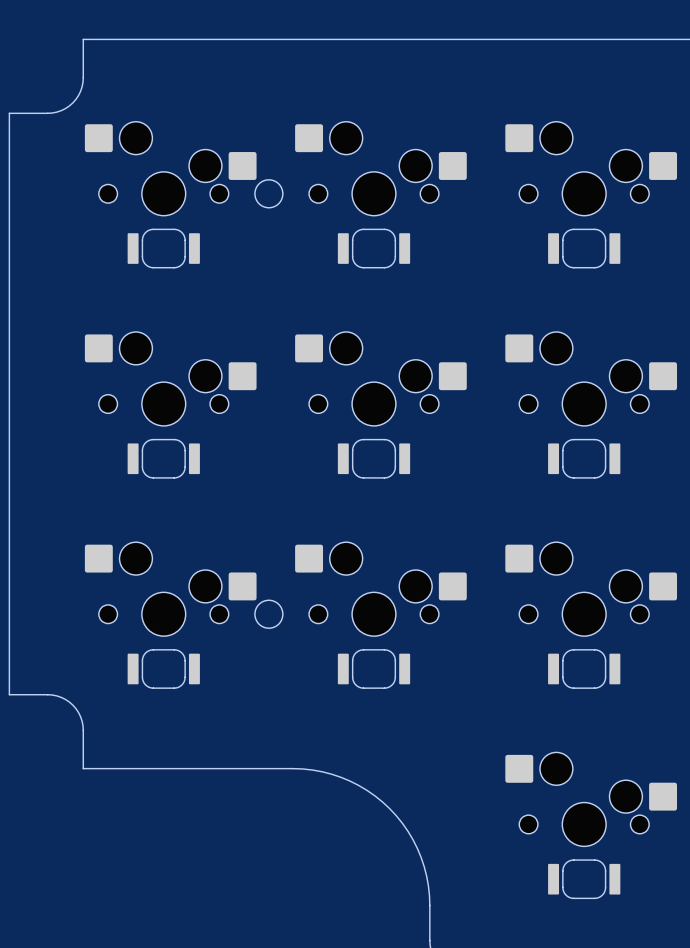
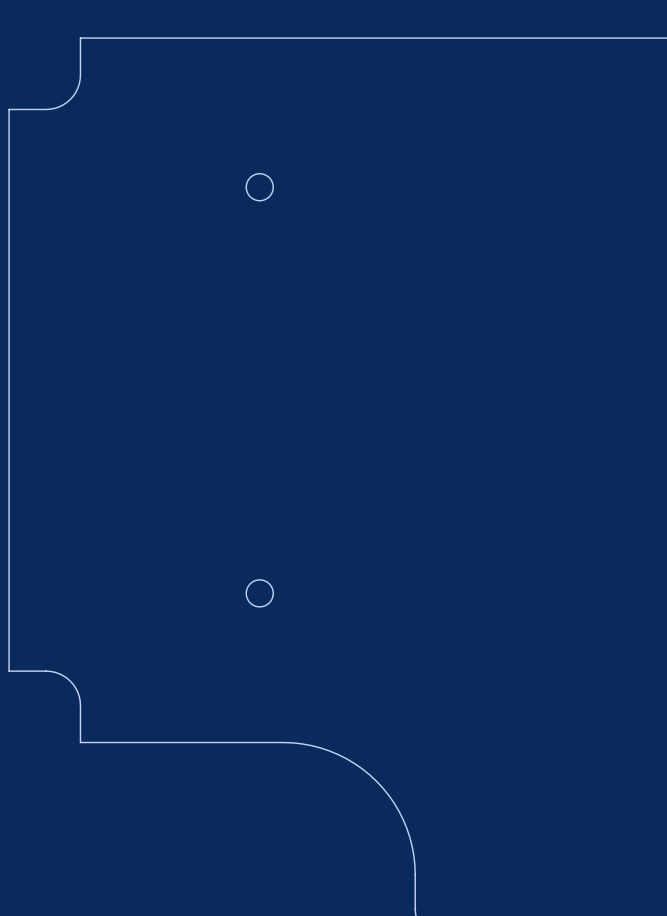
part: (170, 168) -> none
part: (380, 168) -> none
part: (591, 168) -> none
part: (163, 248) -> none
part: (373, 248) -> none
part: (584, 248) -> none
part: (170, 378) -> none
part: (380, 378) -> none
part: (591, 378) -> none
part: (163, 458) -> none
part: (373, 458) -> none
part: (584, 458) -> none
part: (170, 589) -> none
part: (380, 589) -> none
part: (591, 589) -> none
part: (163, 668) -> none
part: (373, 668) -> none
part: (584, 668) -> none
part: (591, 799) -> none
part: (584, 879) -> none

